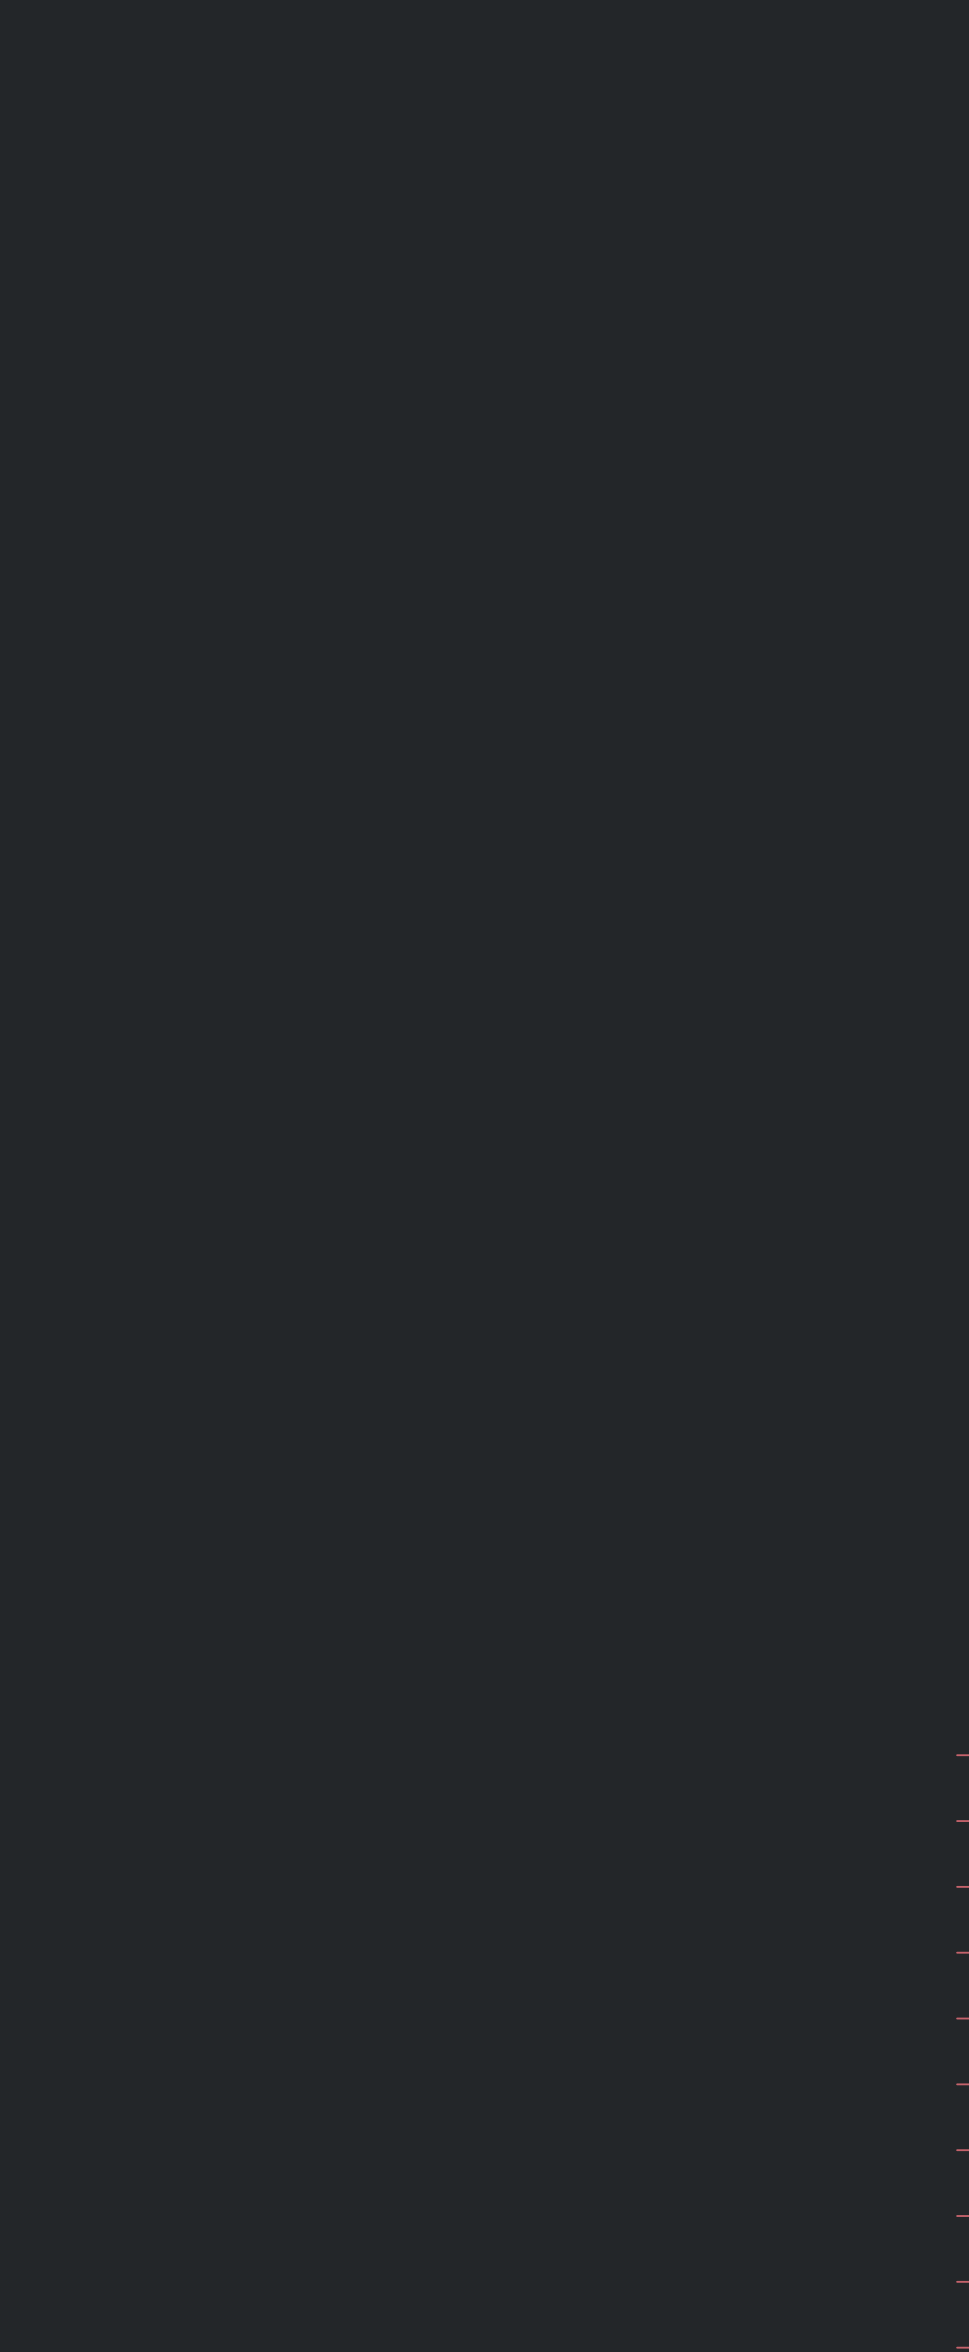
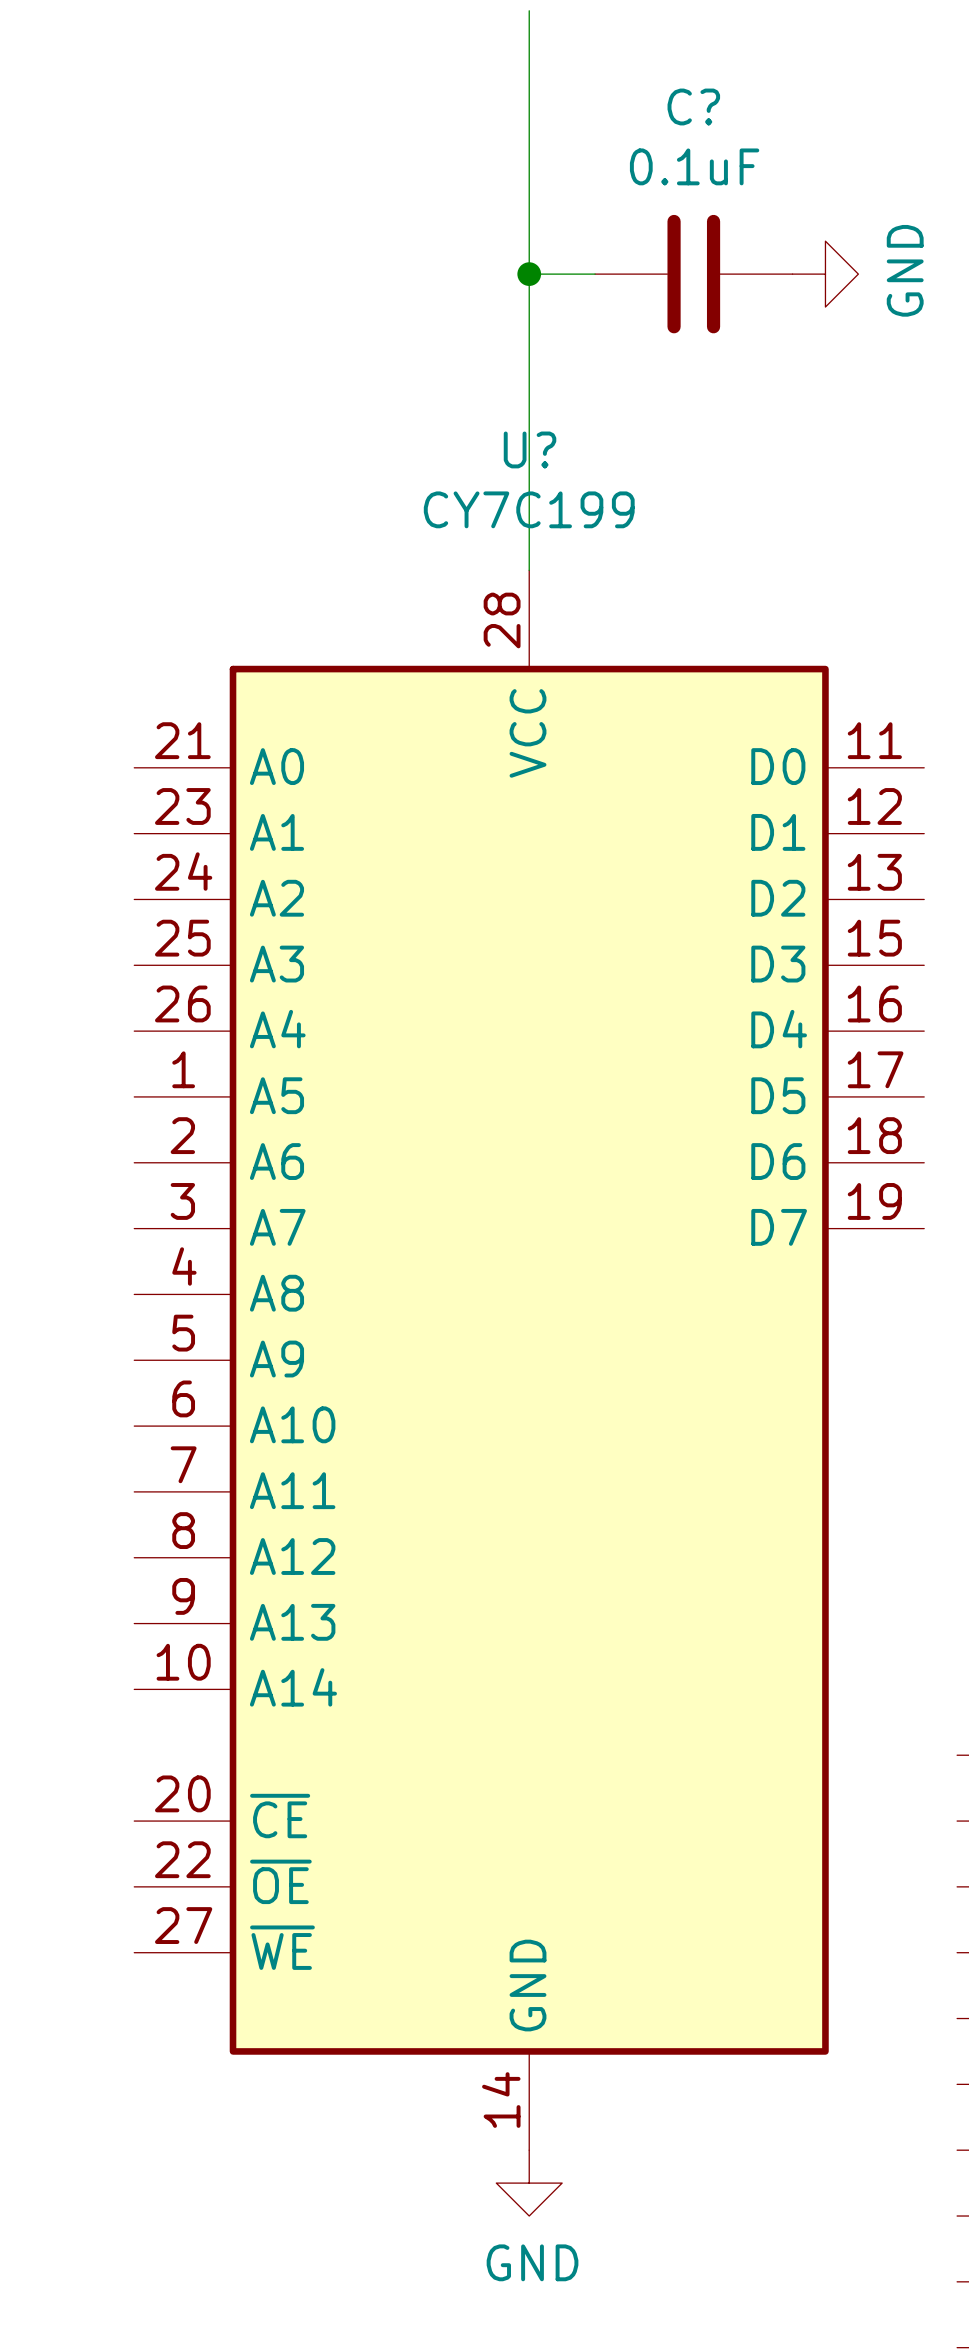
wire: none -> (529, 10) (529, 570)
wire: none -> (529, 274) (595, 274)
junction: none -> (529, 274)
C?: none -> 0.1uF (693, 274)
power symbol: none -> GND (825, 274)
U?: none -> CY7C199 (529, 1360)
power symbol: none -> GND (529, 2183)

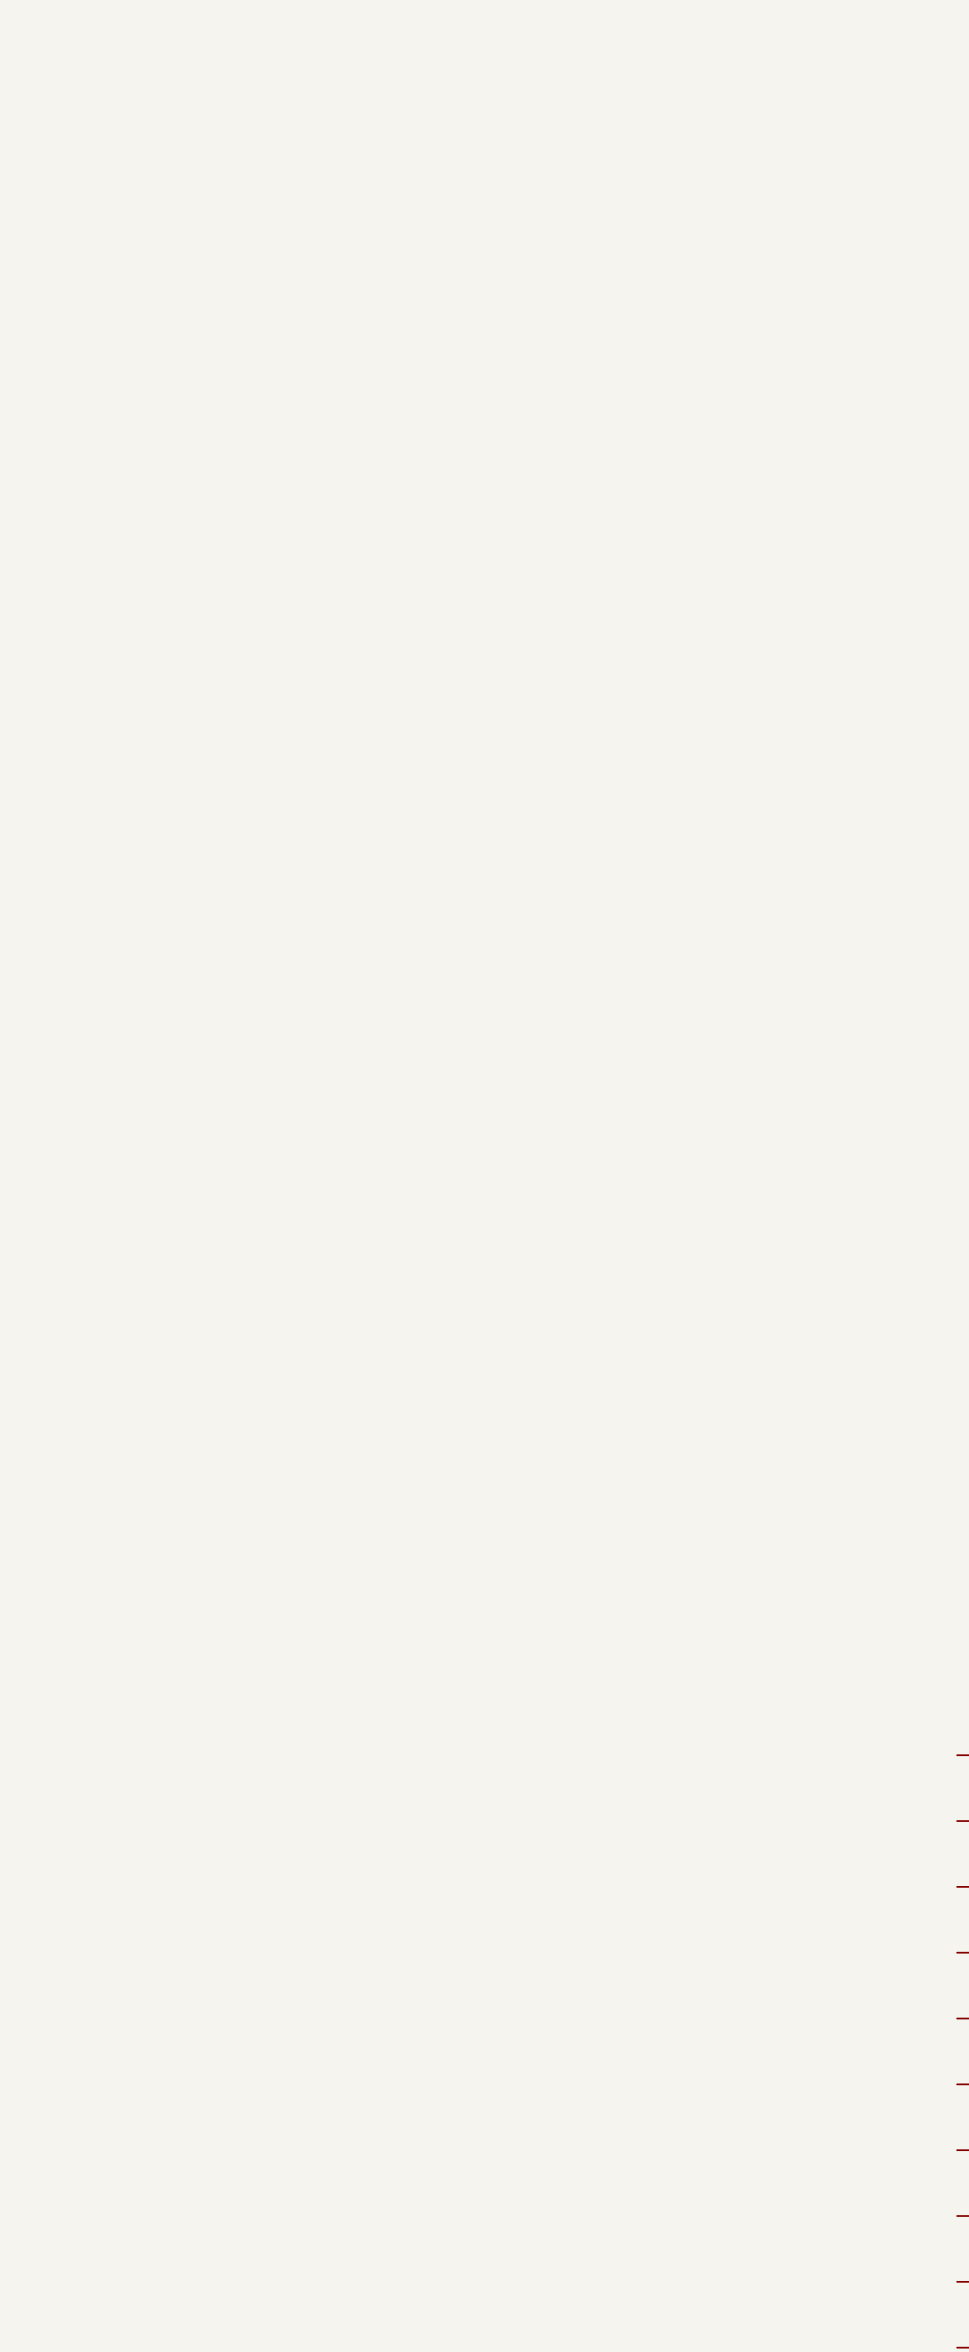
wire: (529, 10) (529, 570) -> none
wire: (529, 274) (595, 274) -> none
junction: (529, 274) -> none
C?: 0.1uF (693, 274) -> none
power symbol: GND (825, 274) -> none
U?: CY7C199 (529, 1360) -> none
power symbol: GND (529, 2183) -> none

